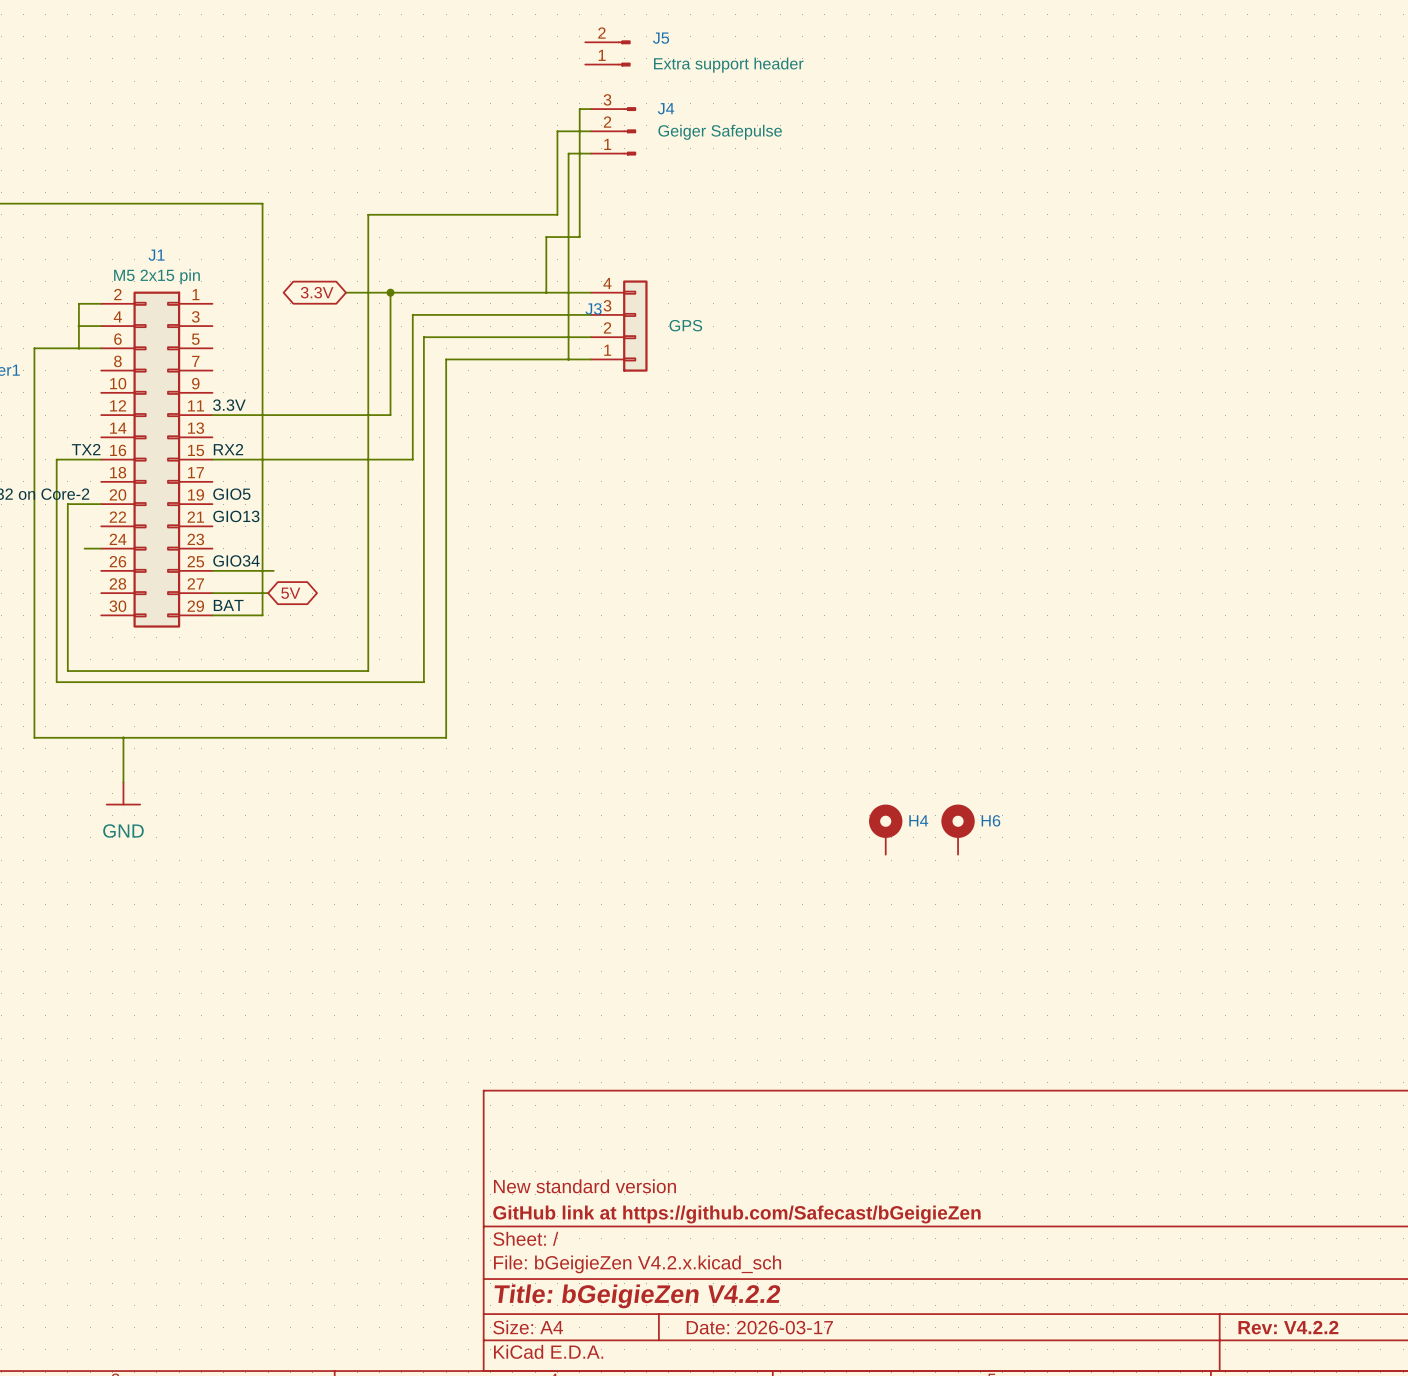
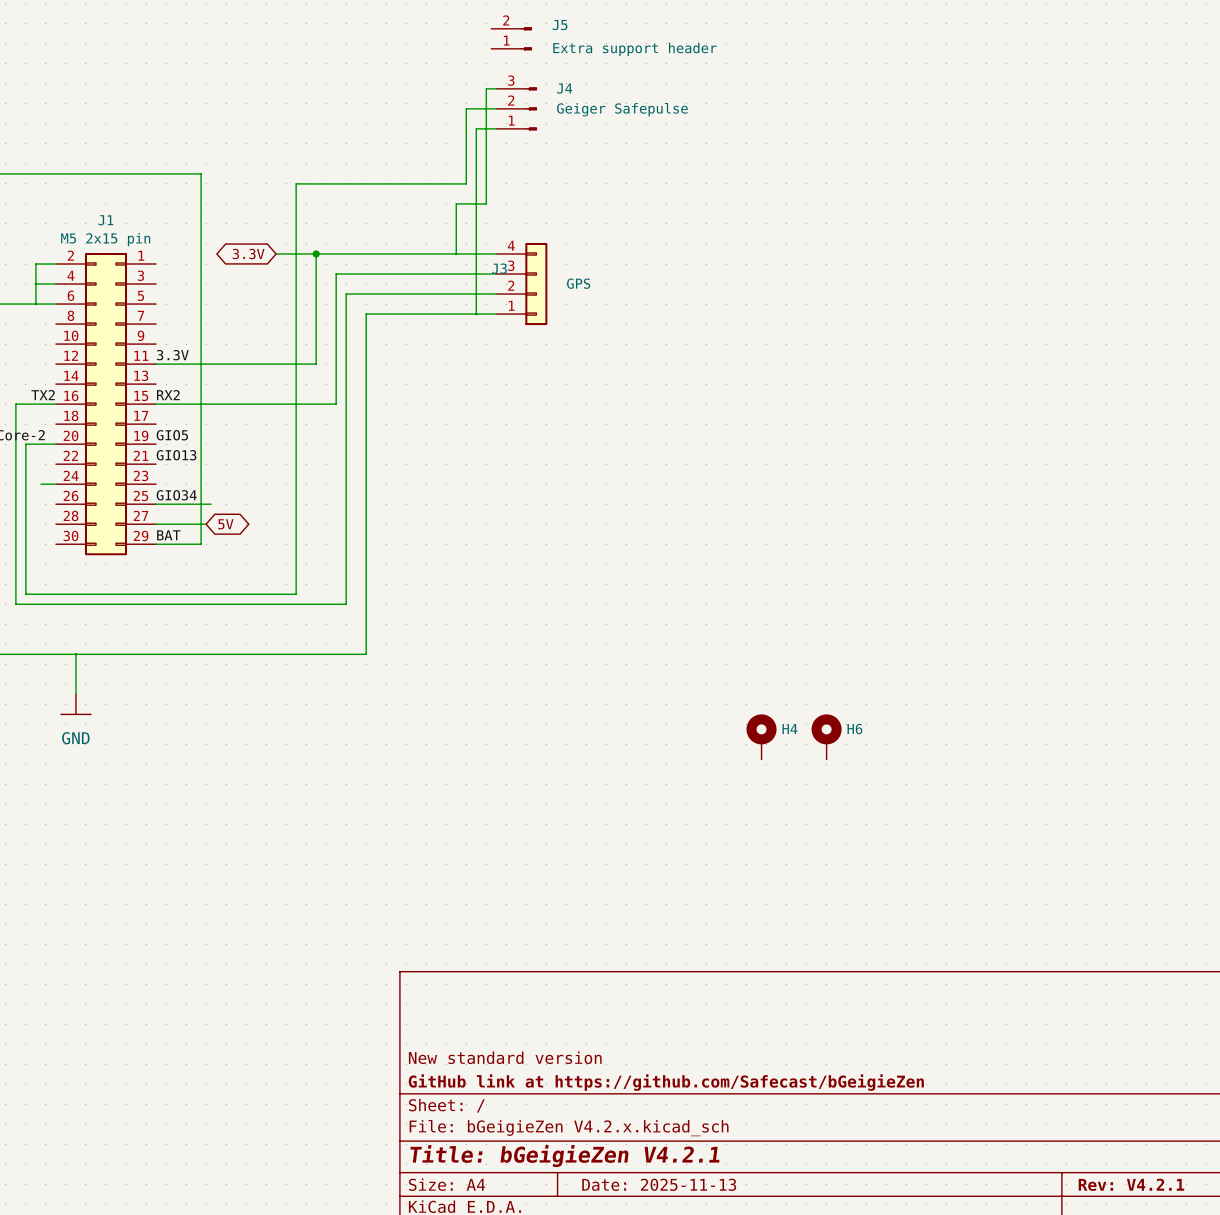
title block: Title: bGeigieZen V4.2.2 (637, 1296) -> Title: bGeigieZen V4.2.1 (564, 1156)
title block: Date: 2026-03-17 (759, 1327) -> Date: 2025-11-13 (659, 1184)
title block: Rev: V4.2.2 (1288, 1327) -> Rev: V4.2.1 (1131, 1184)

